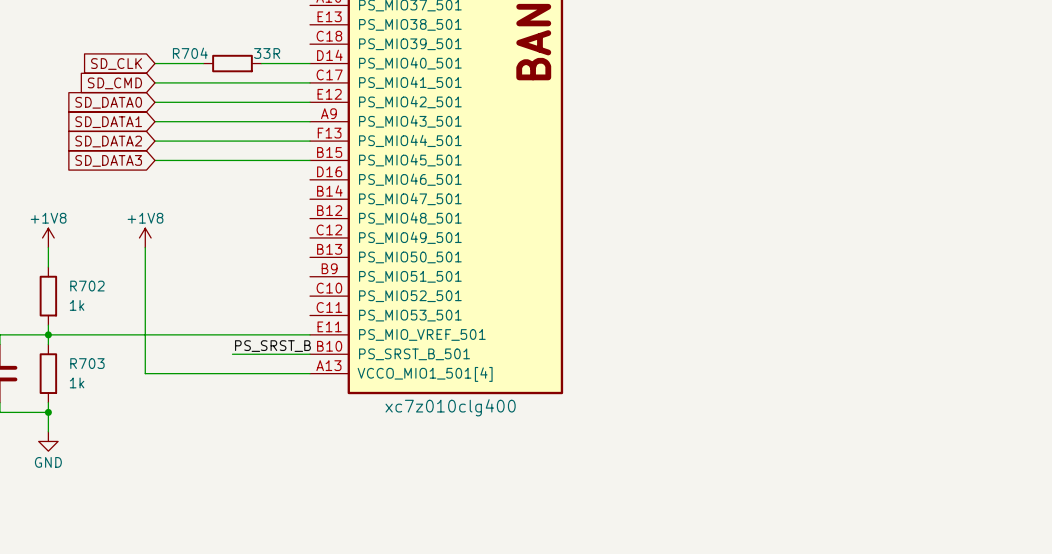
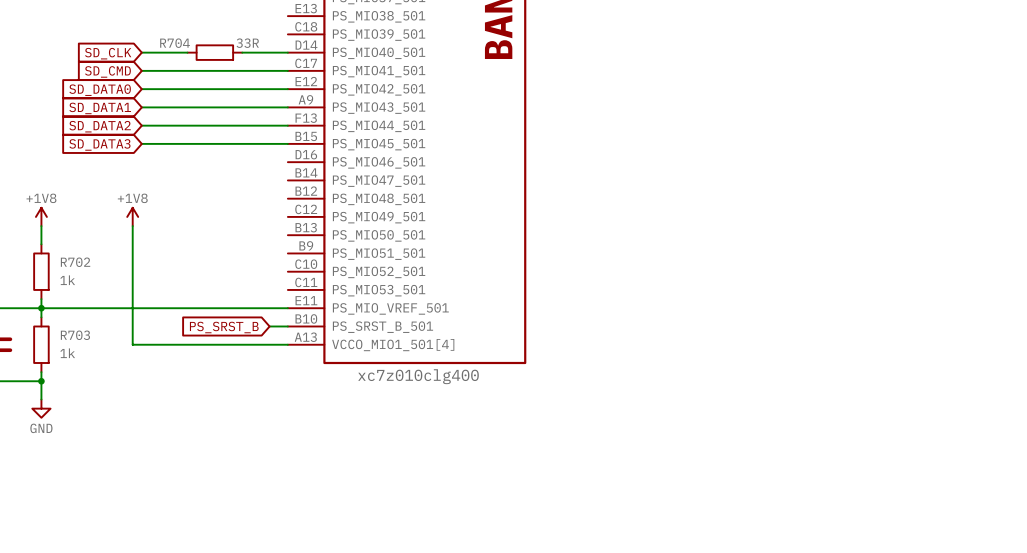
label: PS_SRST_B (272, 346) -> none
wire: (232, 354) (290, 354) -> none
global label: none -> PS_SRST_B (224, 327)

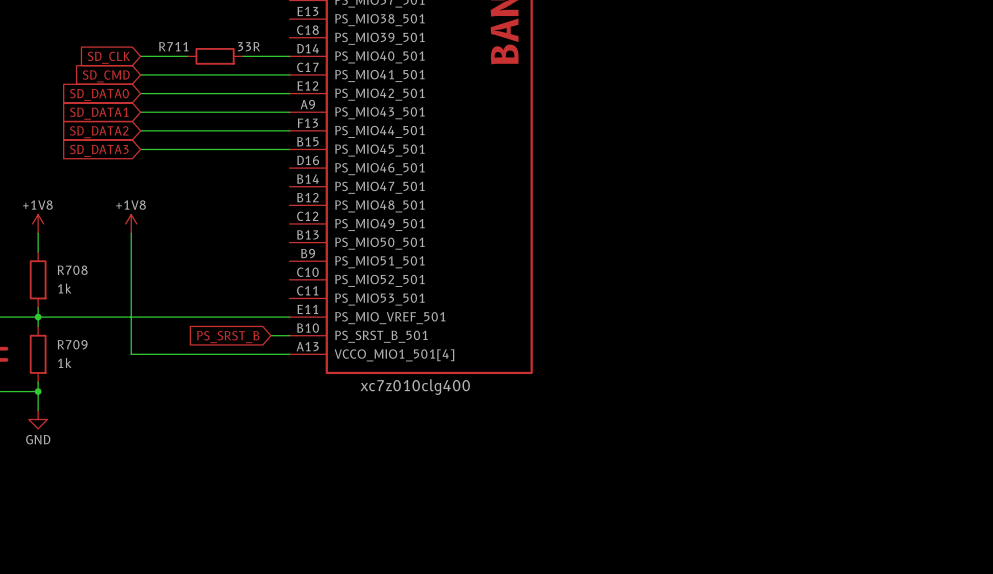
R704 name: R704 (175, 43) -> R711 (173, 46)
R702 name: R702 (75, 262) -> R708 (72, 270)
R703 name: R703 (75, 335) -> R709 (72, 344)

